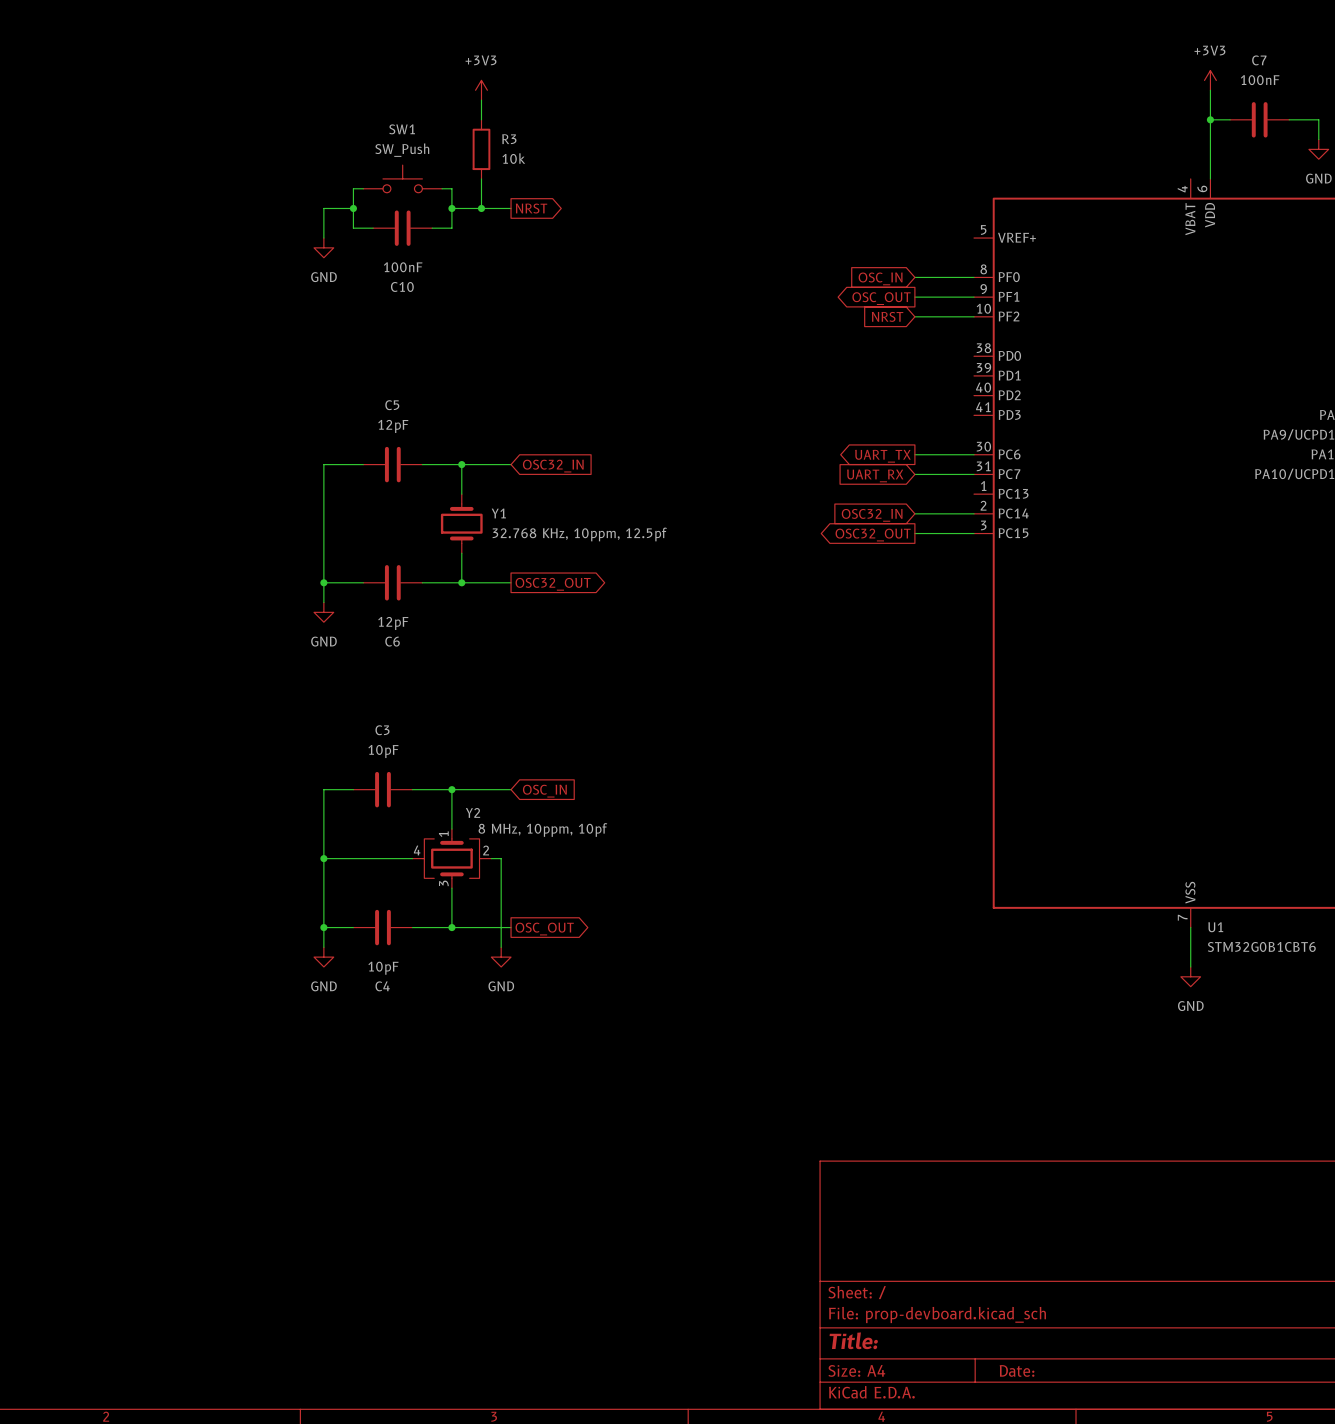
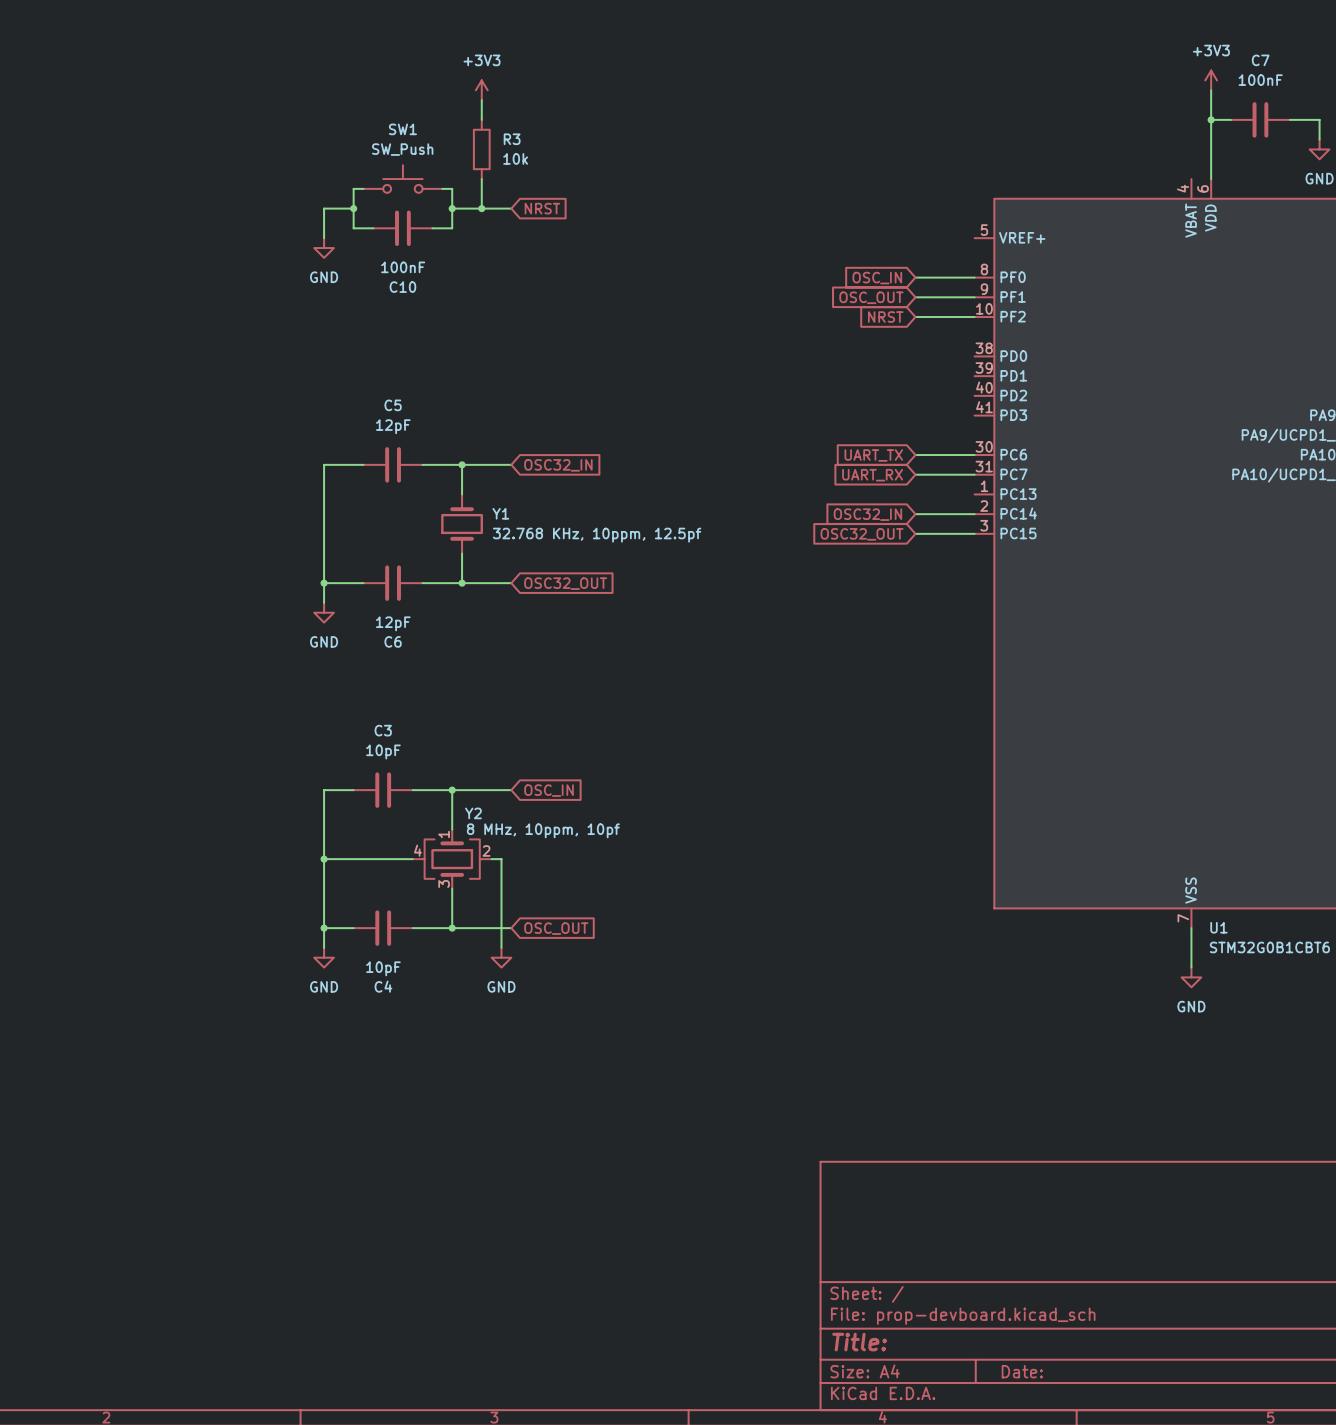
global label shape: output (531, 208) -> input (542, 208)
global label shape: output (881, 298) -> input (871, 297)
global label shape: output (882, 456) -> input (873, 455)
global label shape: output (873, 535) -> input (862, 534)
global label shape: output (553, 584) -> input (565, 583)
global label shape: output (544, 929) -> input (556, 928)

